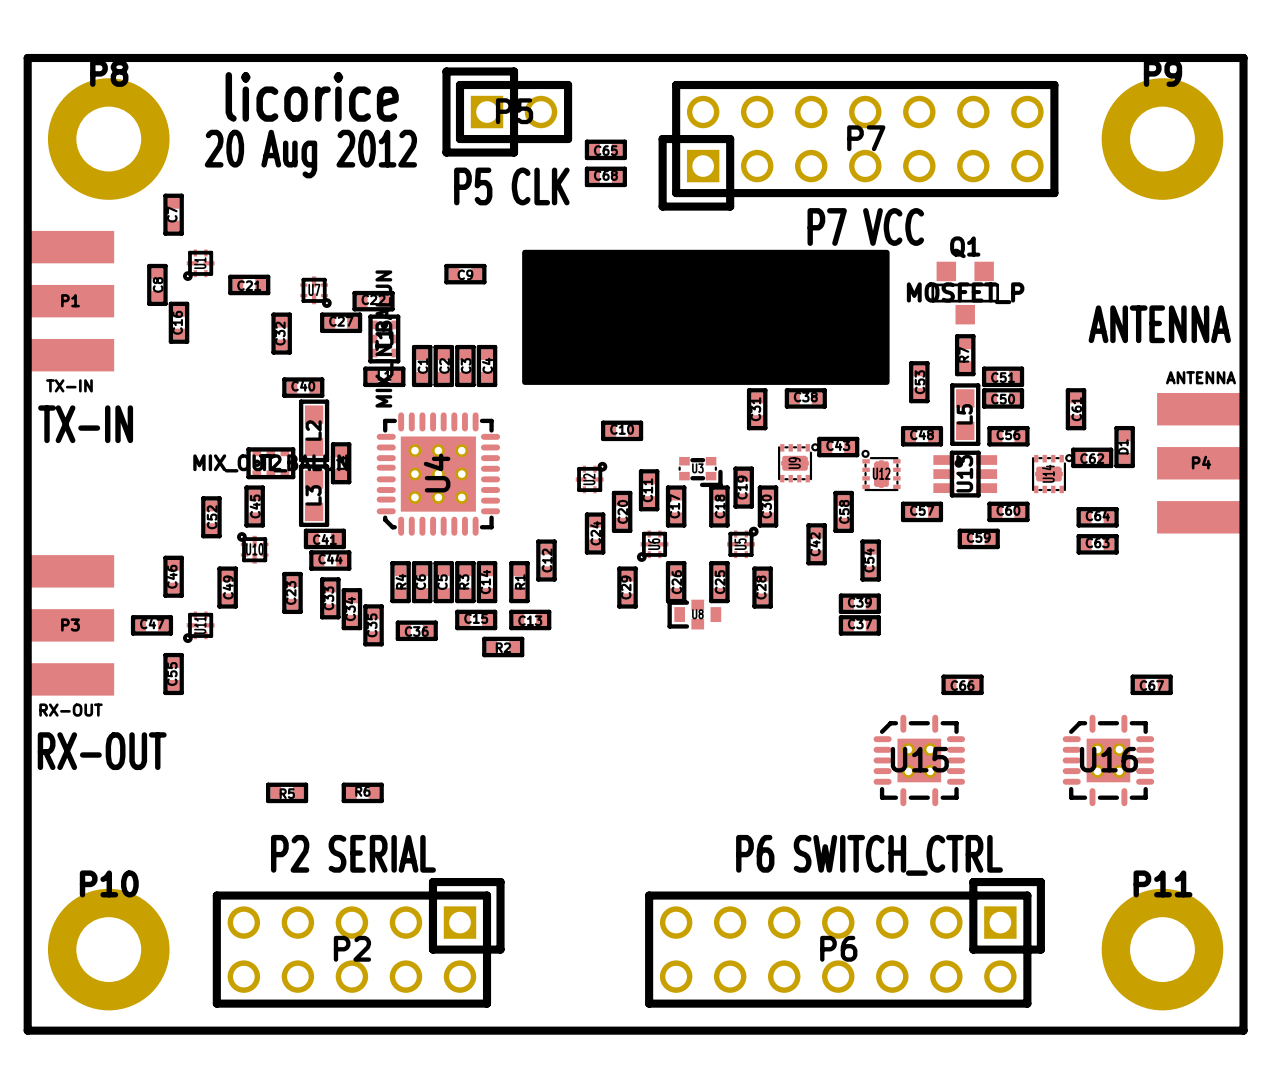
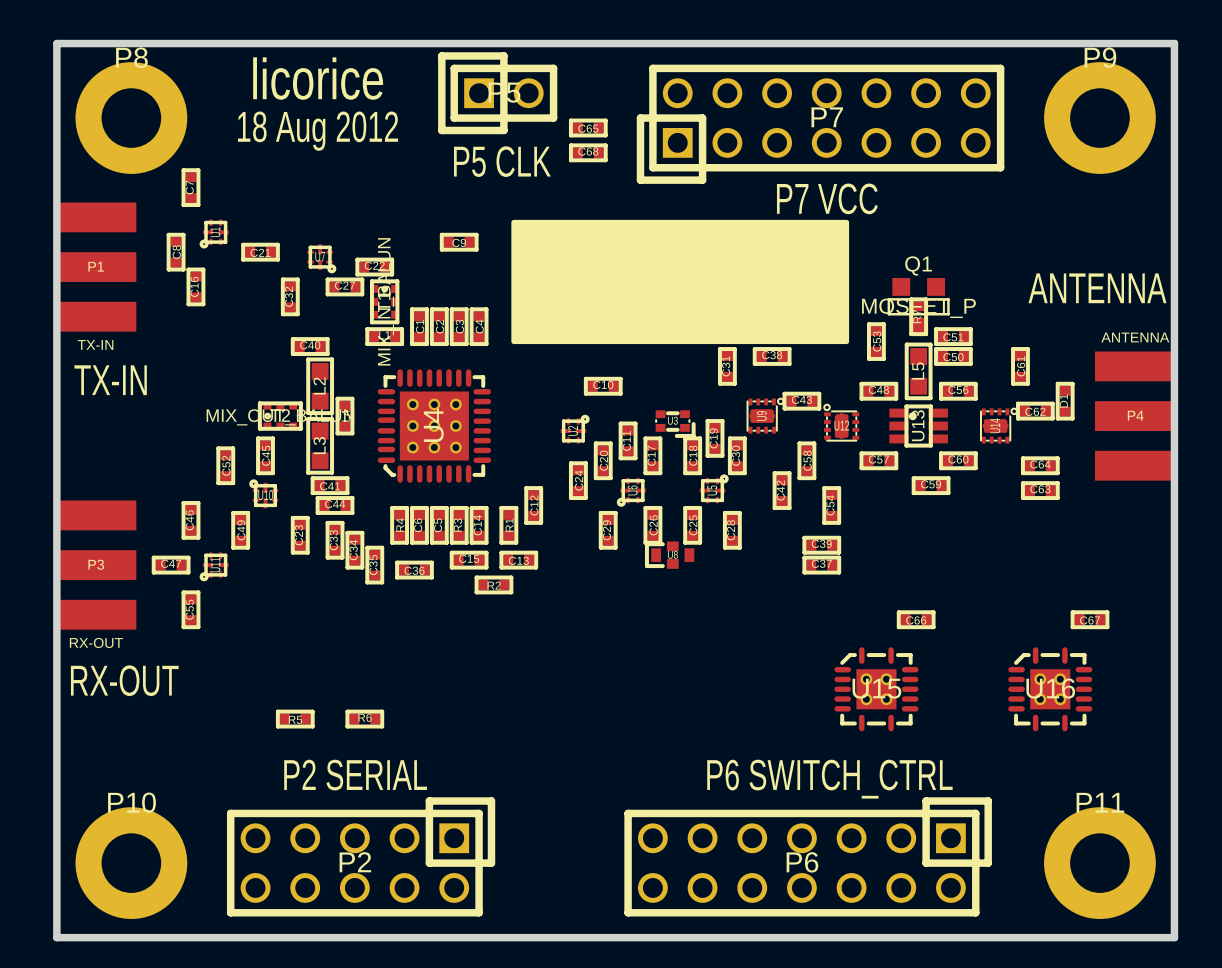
text: 20 Aug 2012 (310, 154) -> 18 Aug 2012 (318, 131)
Q1 position: (965, 293) -> (918, 306)

